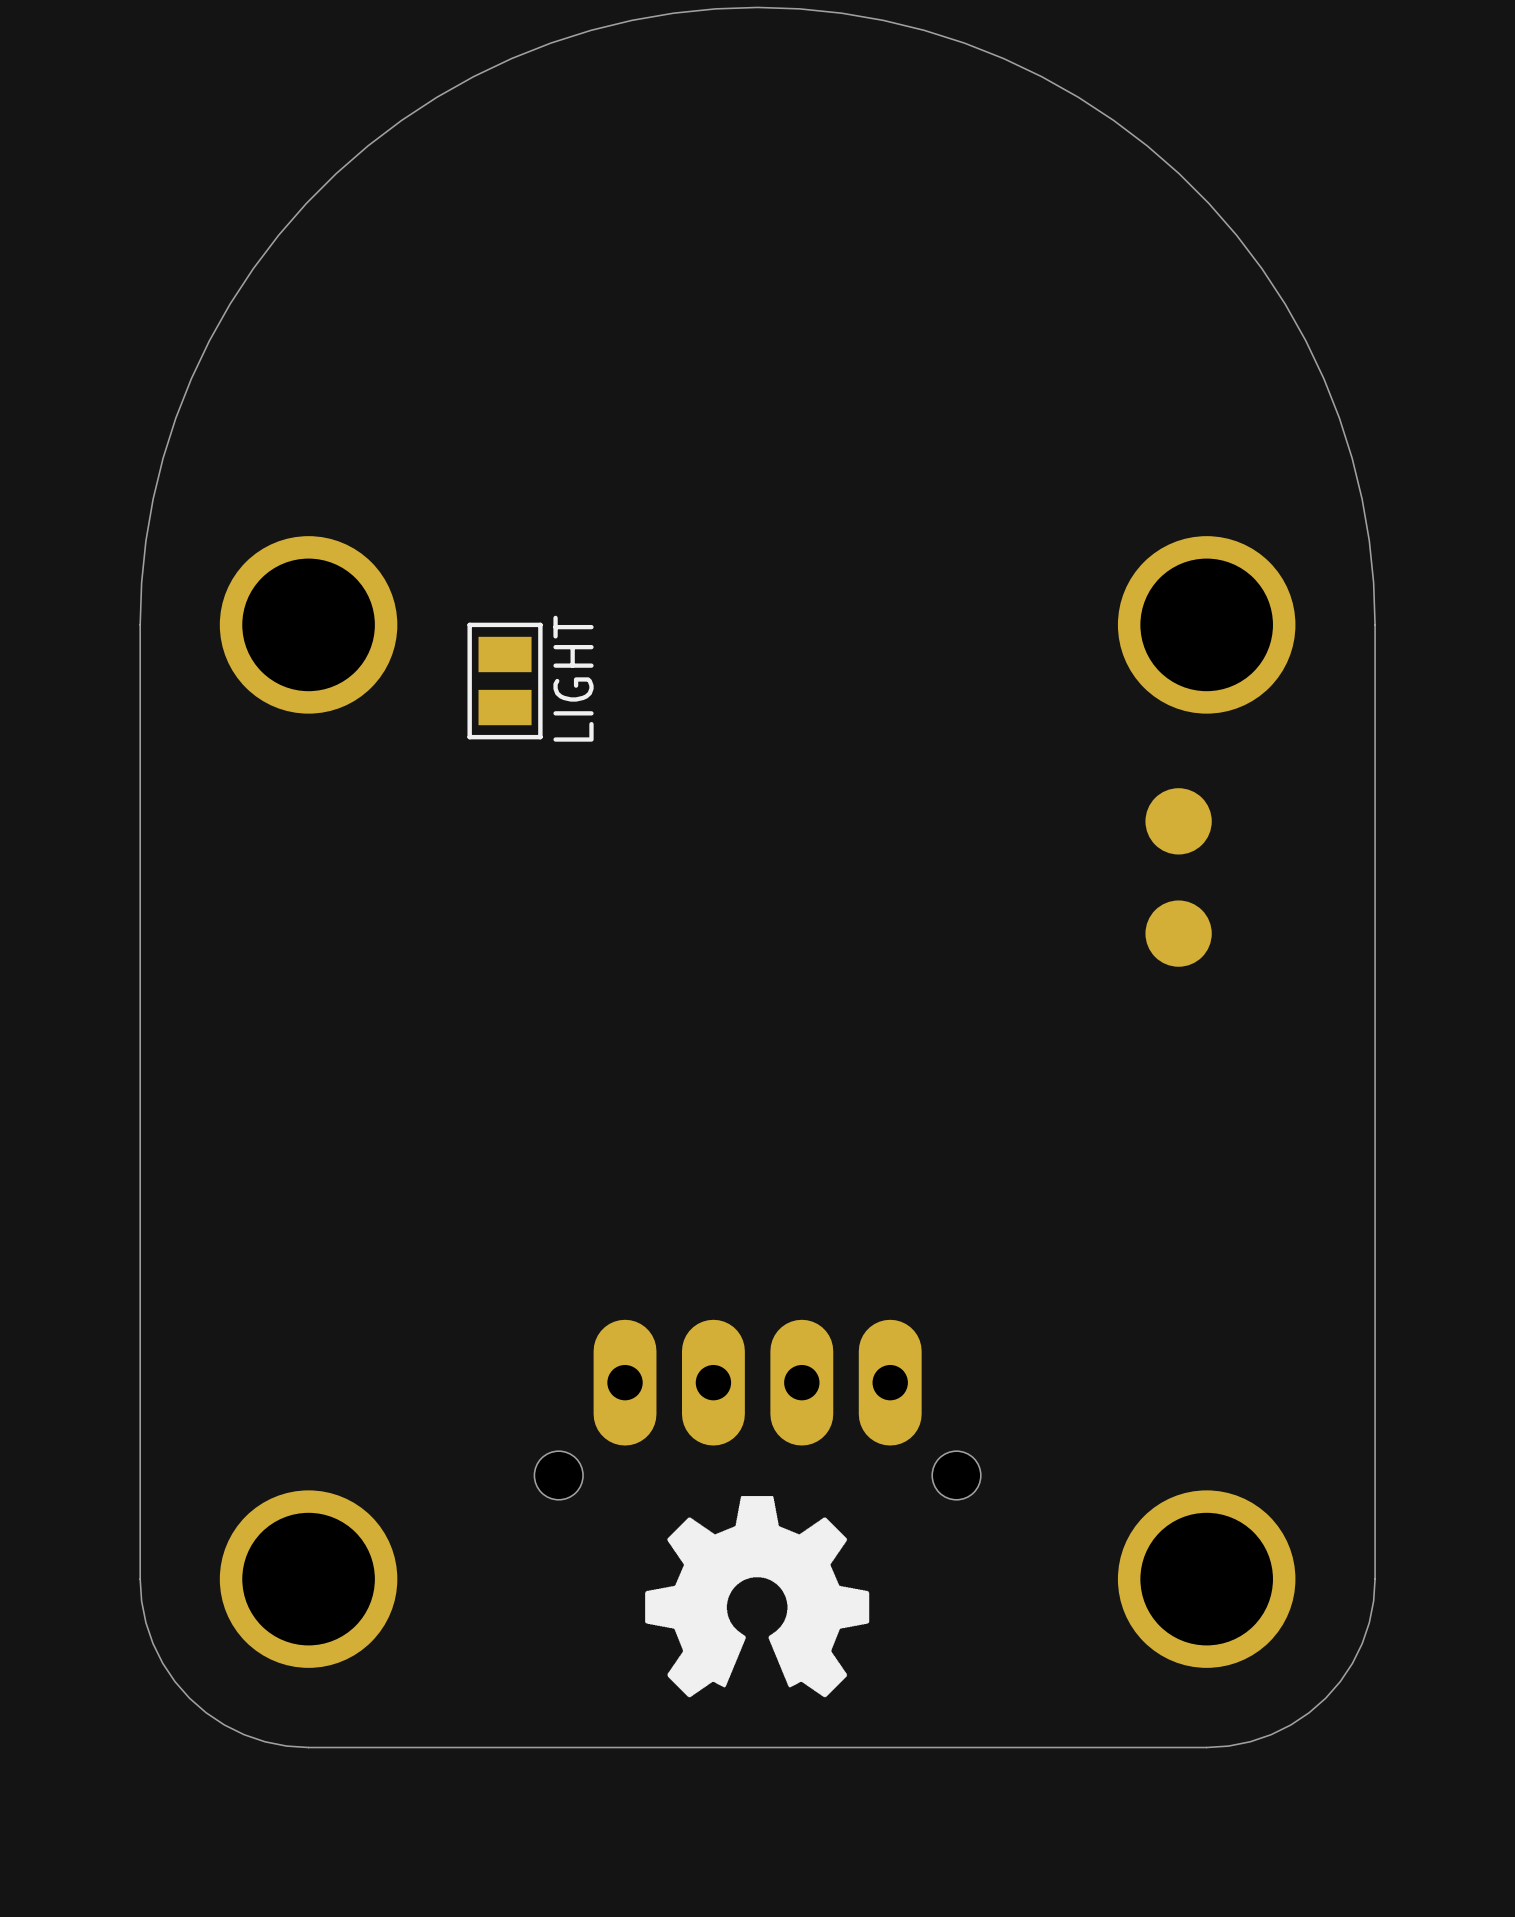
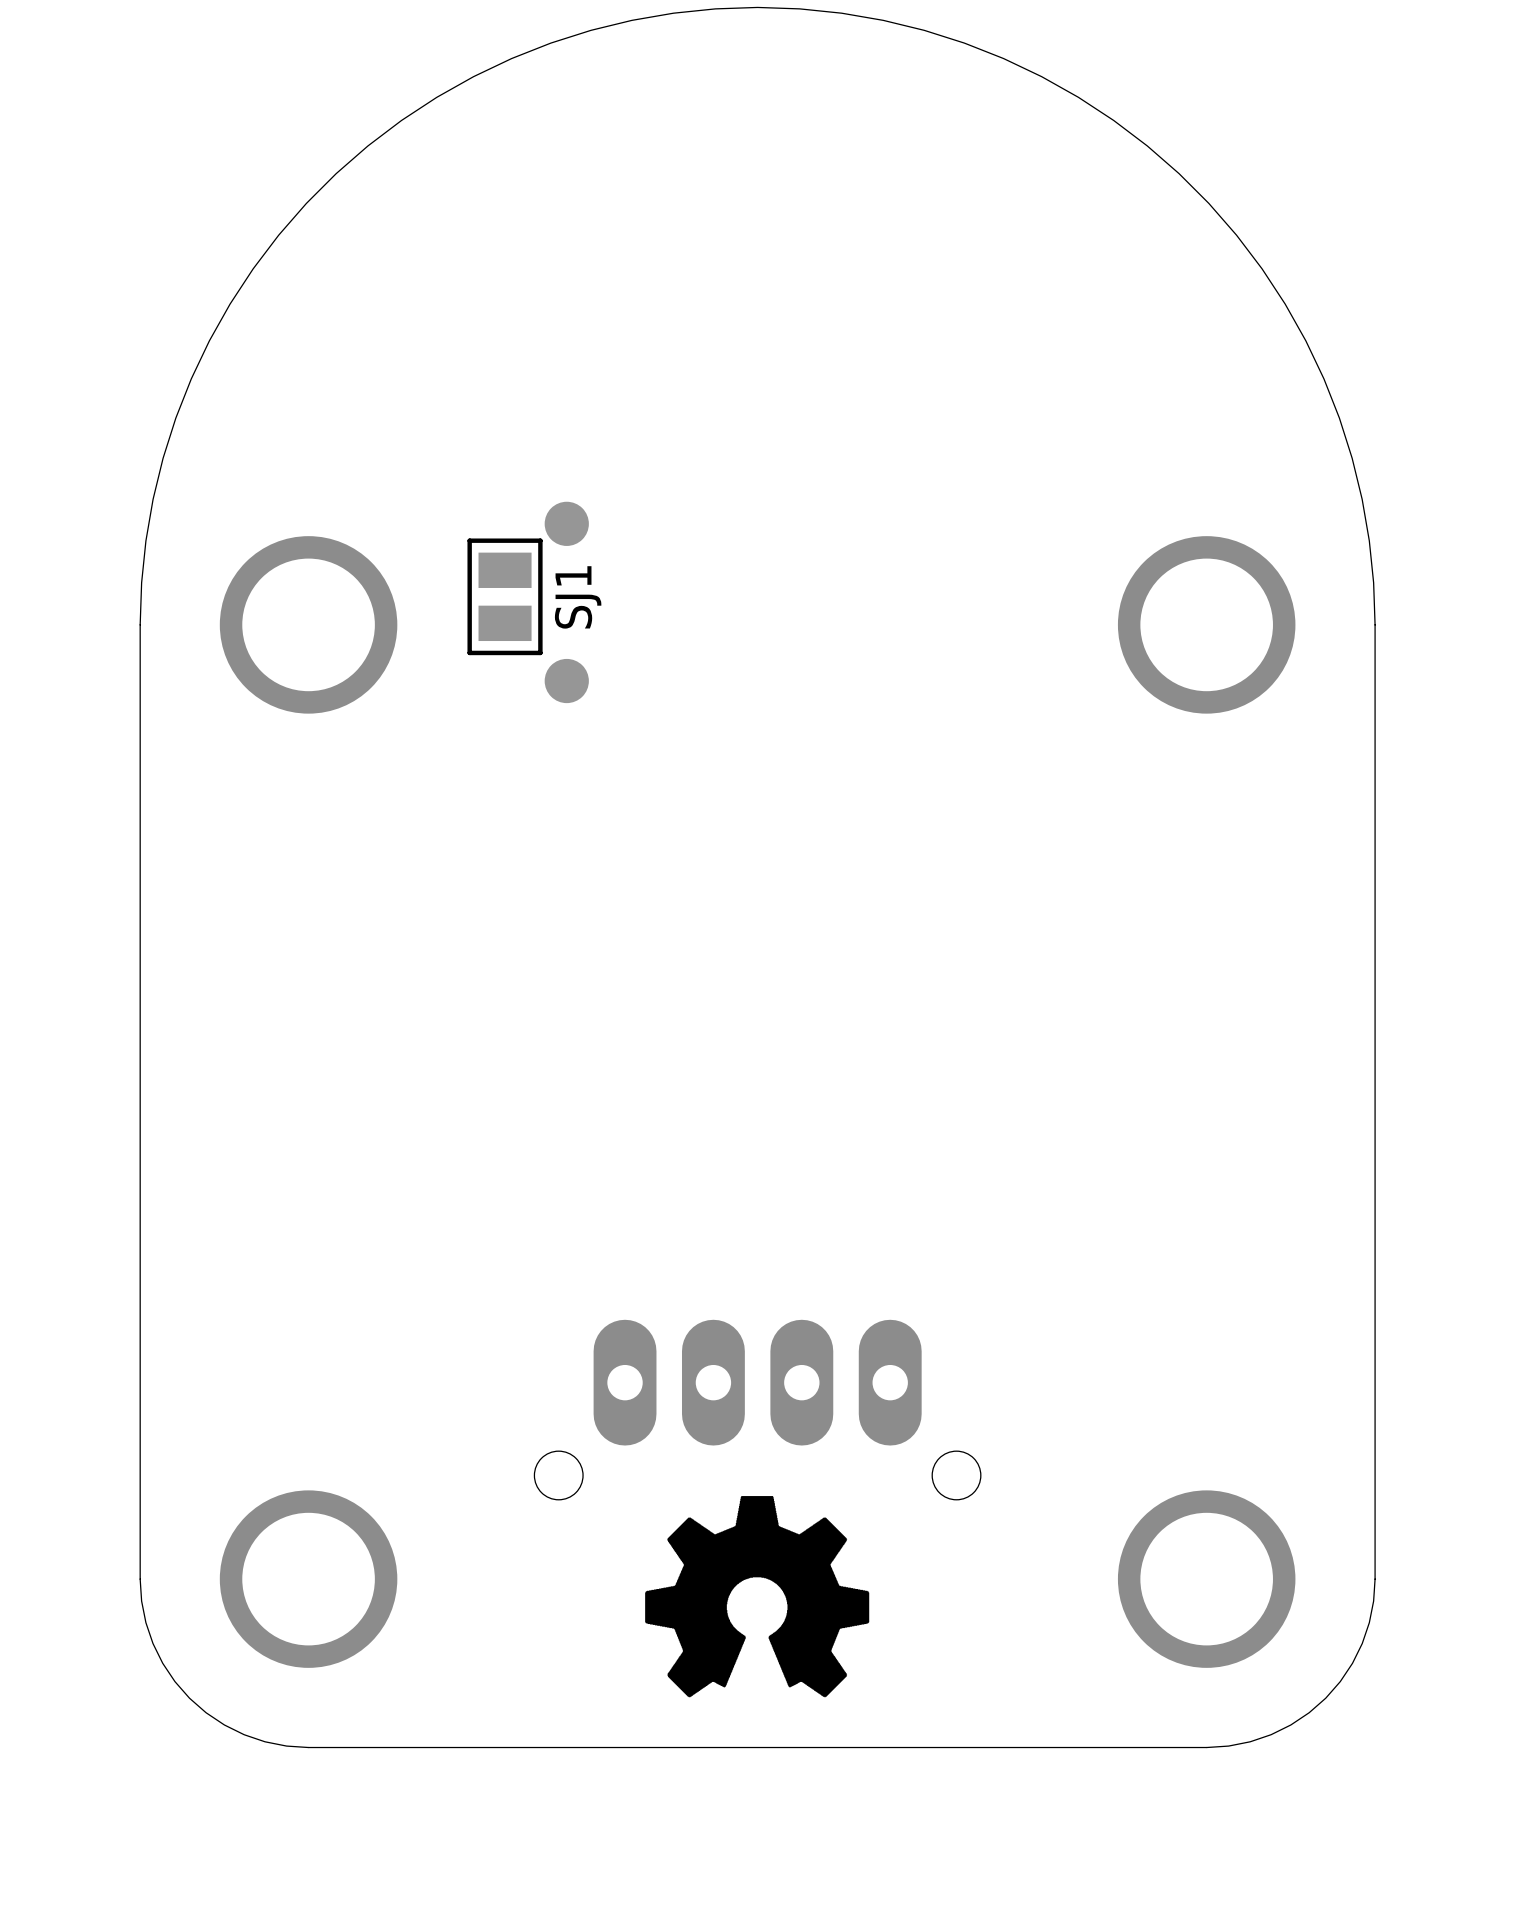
part: none -> (566, 523)
SJ1: none -> (505, 596)
text: LIGHT (573, 678) -> none
part: (505, 681) -> none
part: none -> (566, 681)
part: (1178, 821) -> none
part: (1178, 933) -> none

